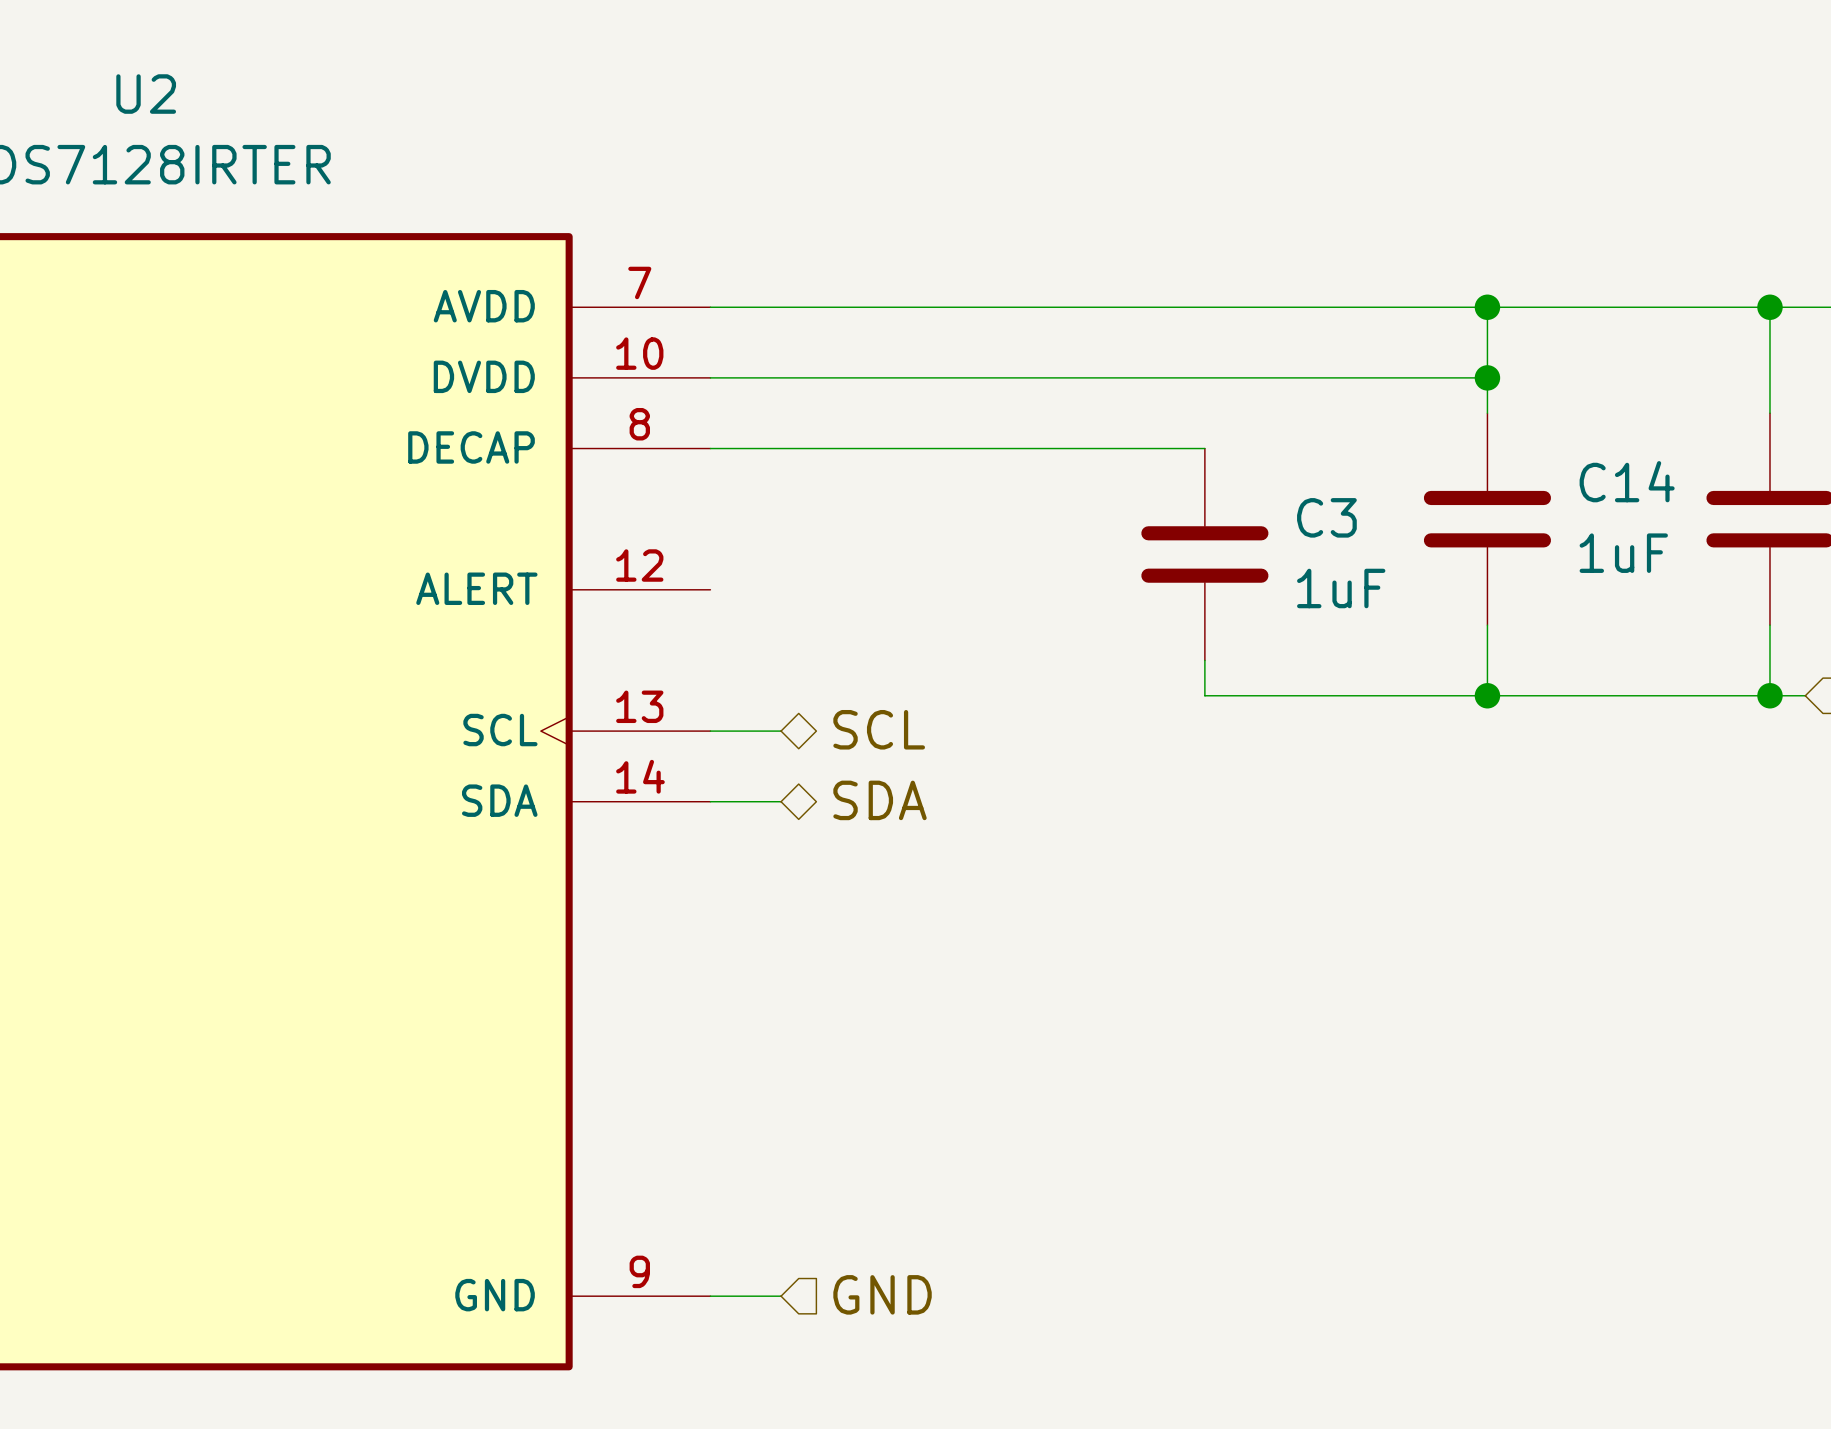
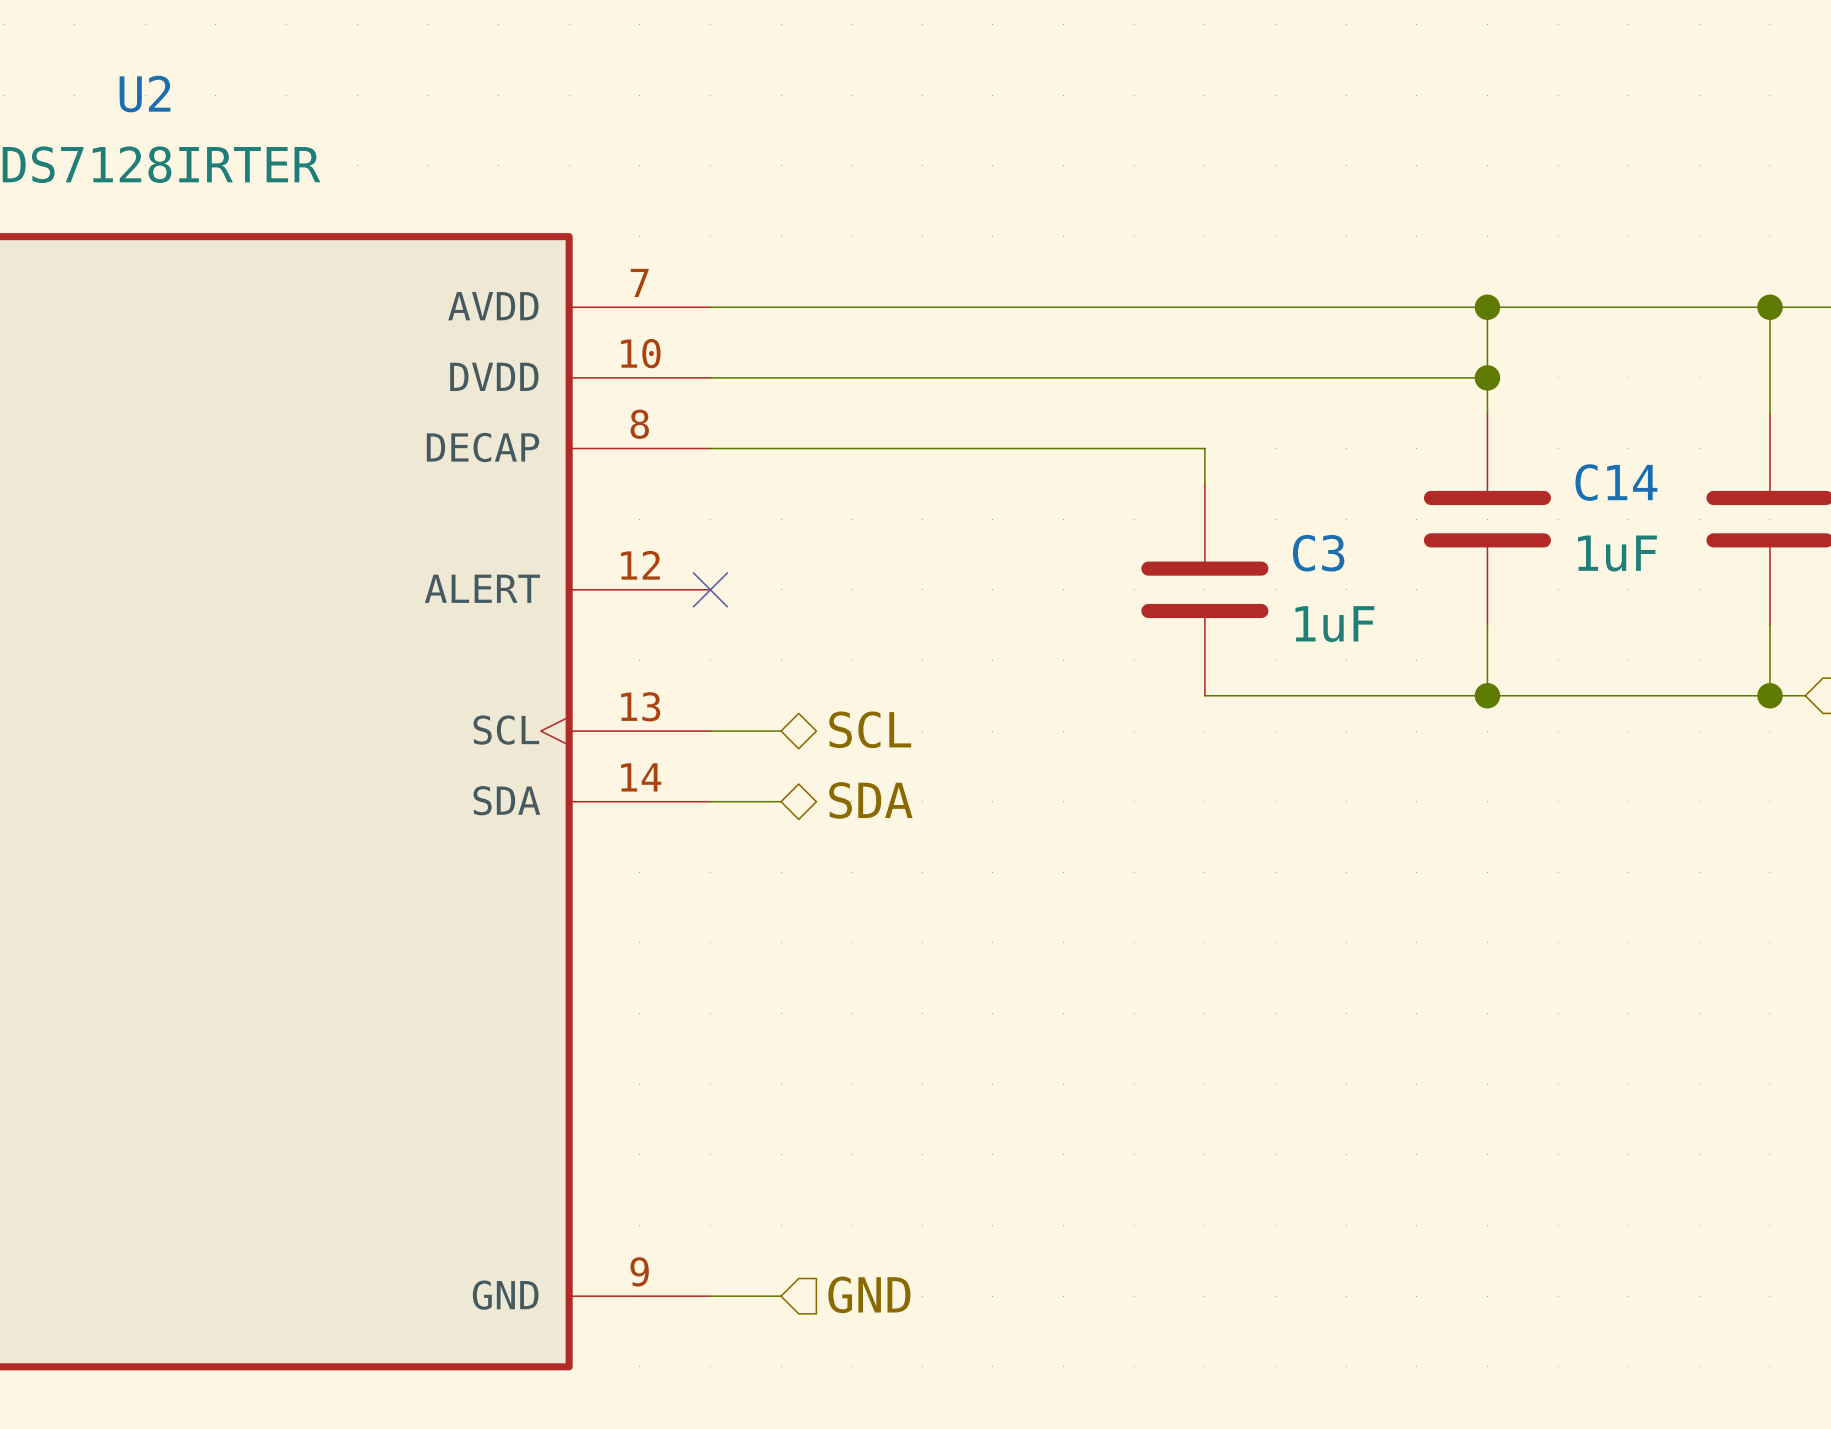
C3 position: (1204, 554) -> (1204, 589)
no-connect mark: none -> (710, 589)

